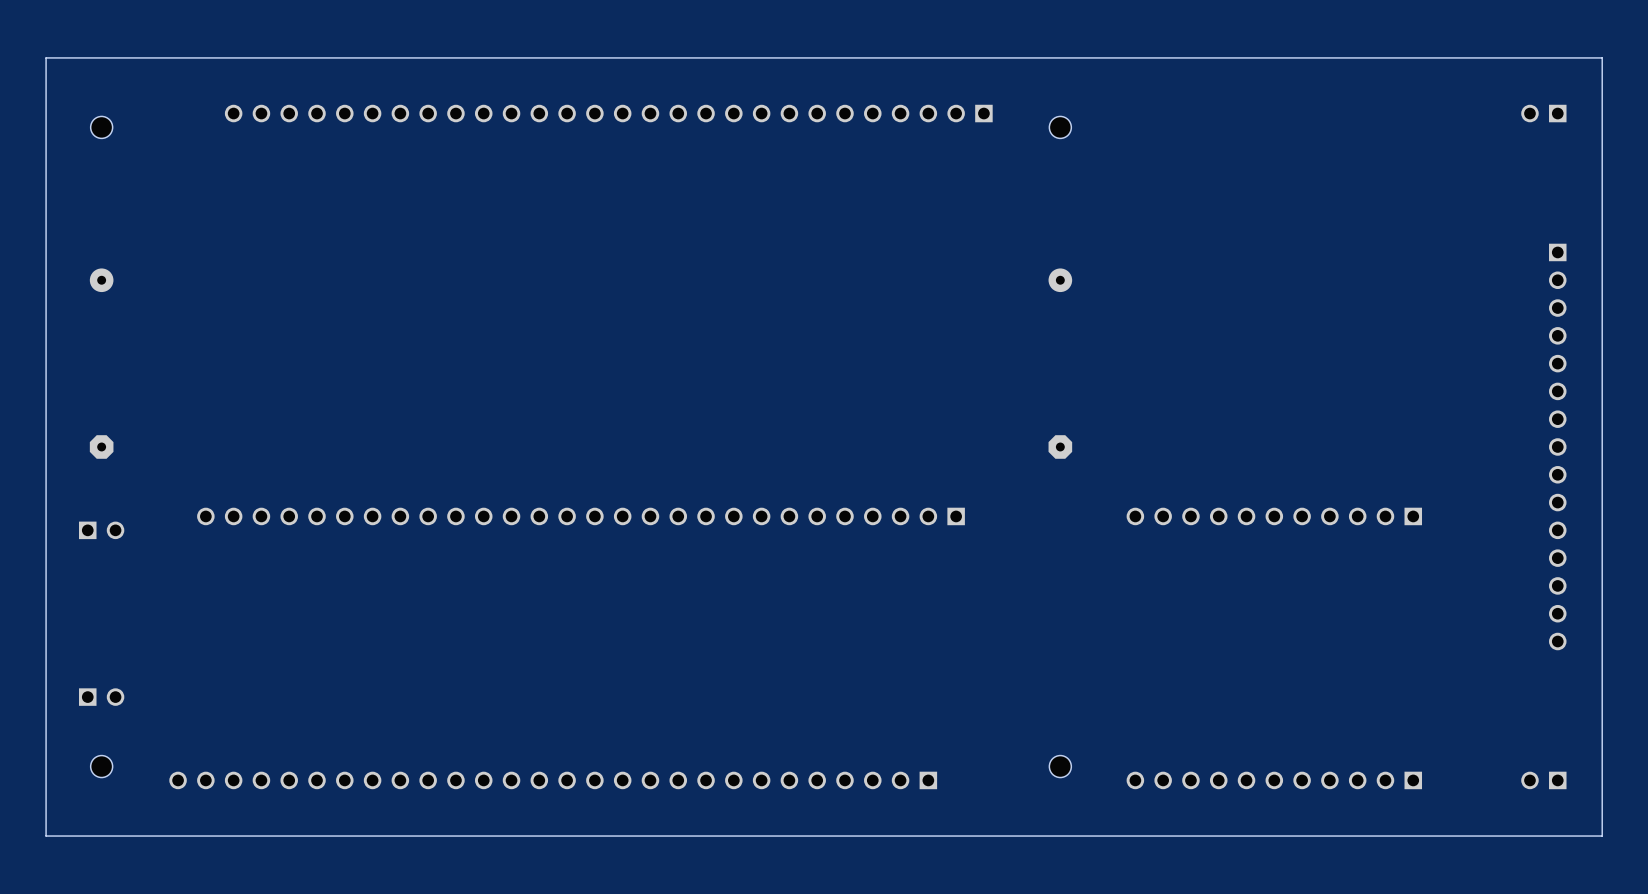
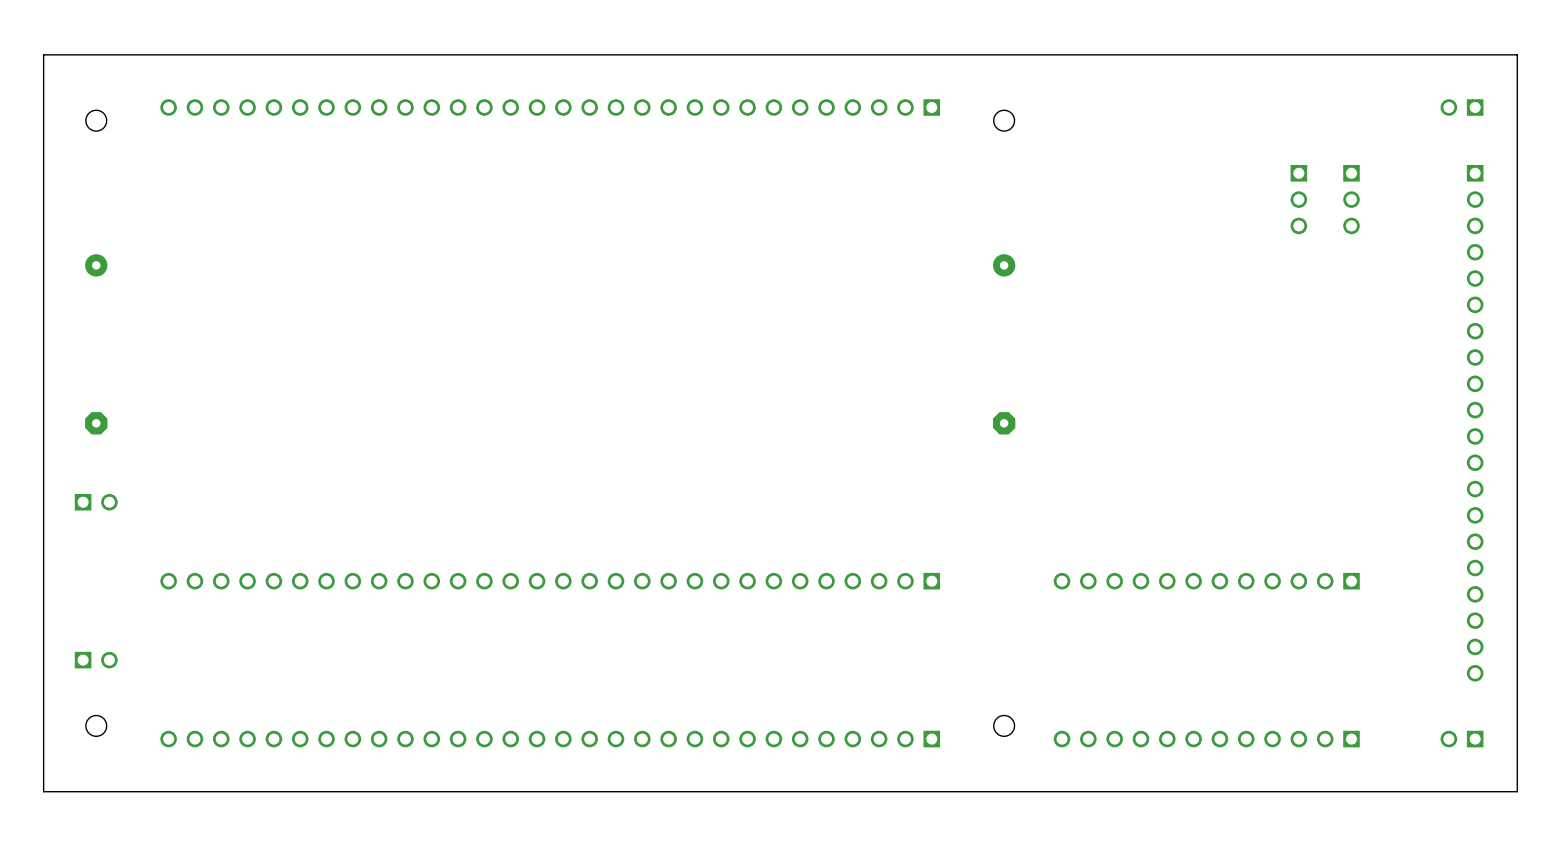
part: none -> (550, 107)
part: none -> (1298, 199)
part: none -> (1351, 199)
part footprint: [1549, 243, 1567, 651] -> [1466, 165, 1484, 682]
part: (581, 516) -> none
part: (1274, 516) -> none
part: none -> (550, 581)
part: none -> (1206, 581)
part footprint: [1126, 771, 1423, 790] -> [1053, 730, 1360, 748]
part: (553, 780) -> none
part: none -> (550, 739)

